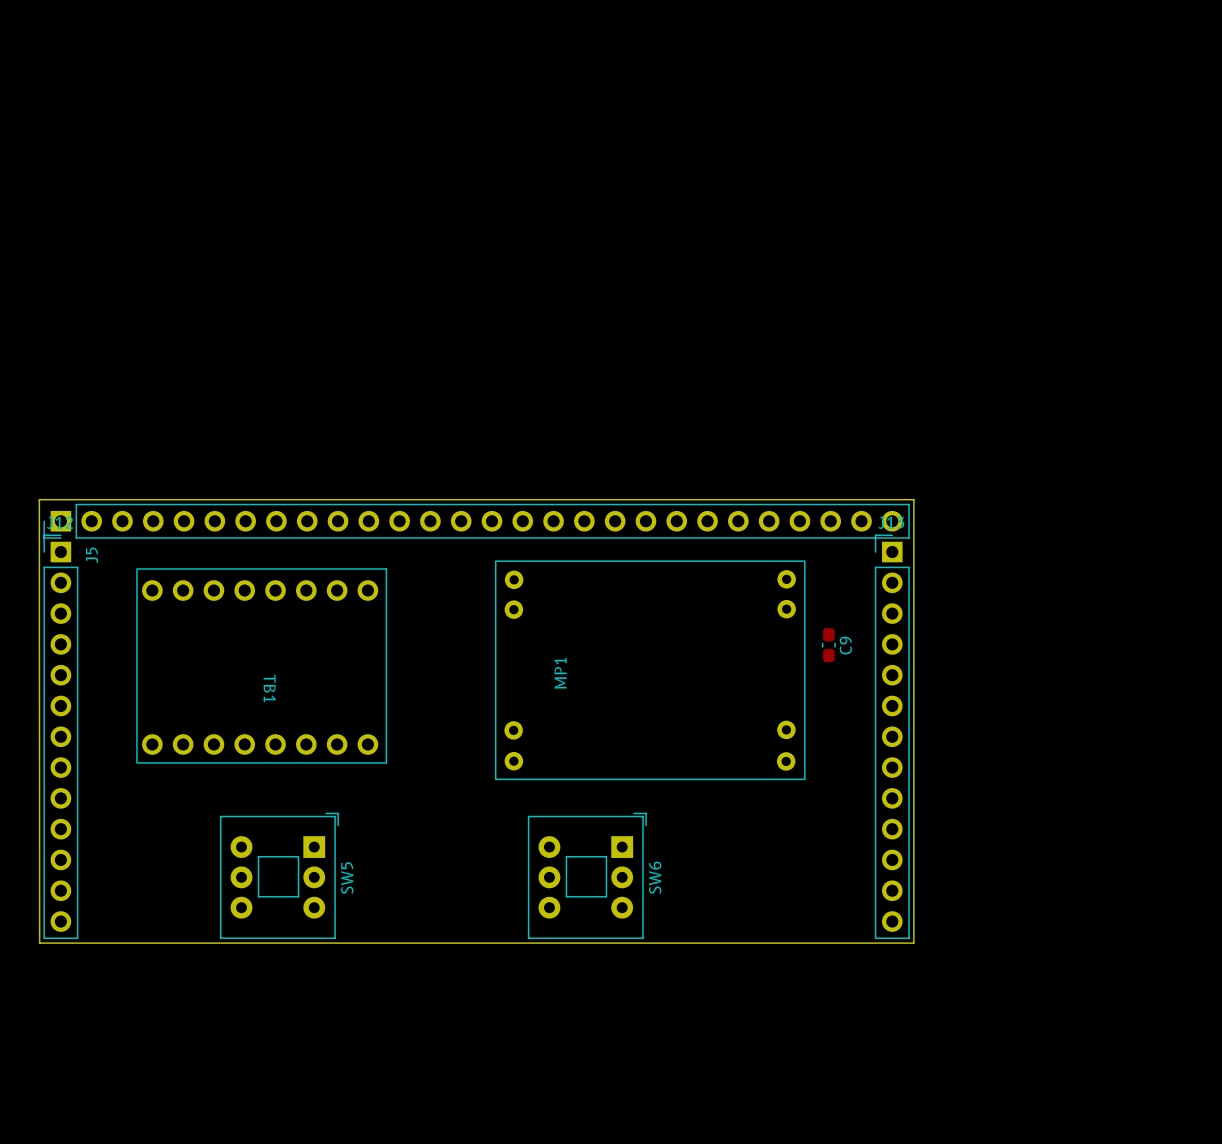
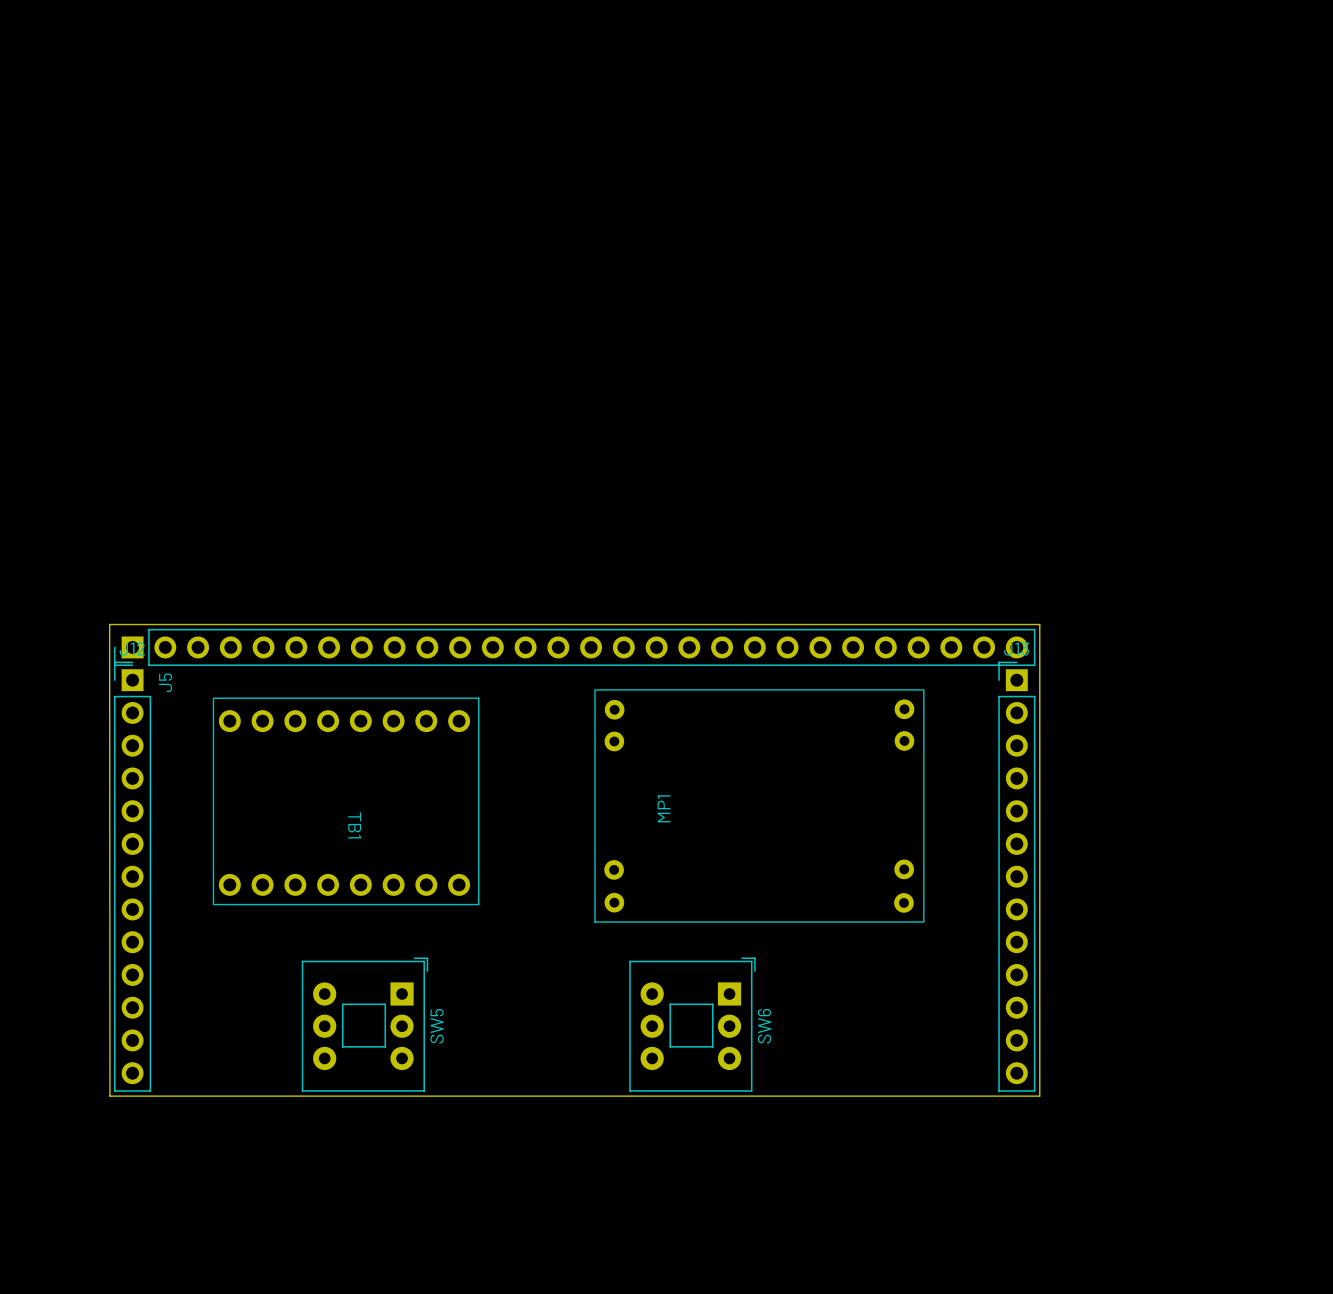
C9: (828, 645) -> none

